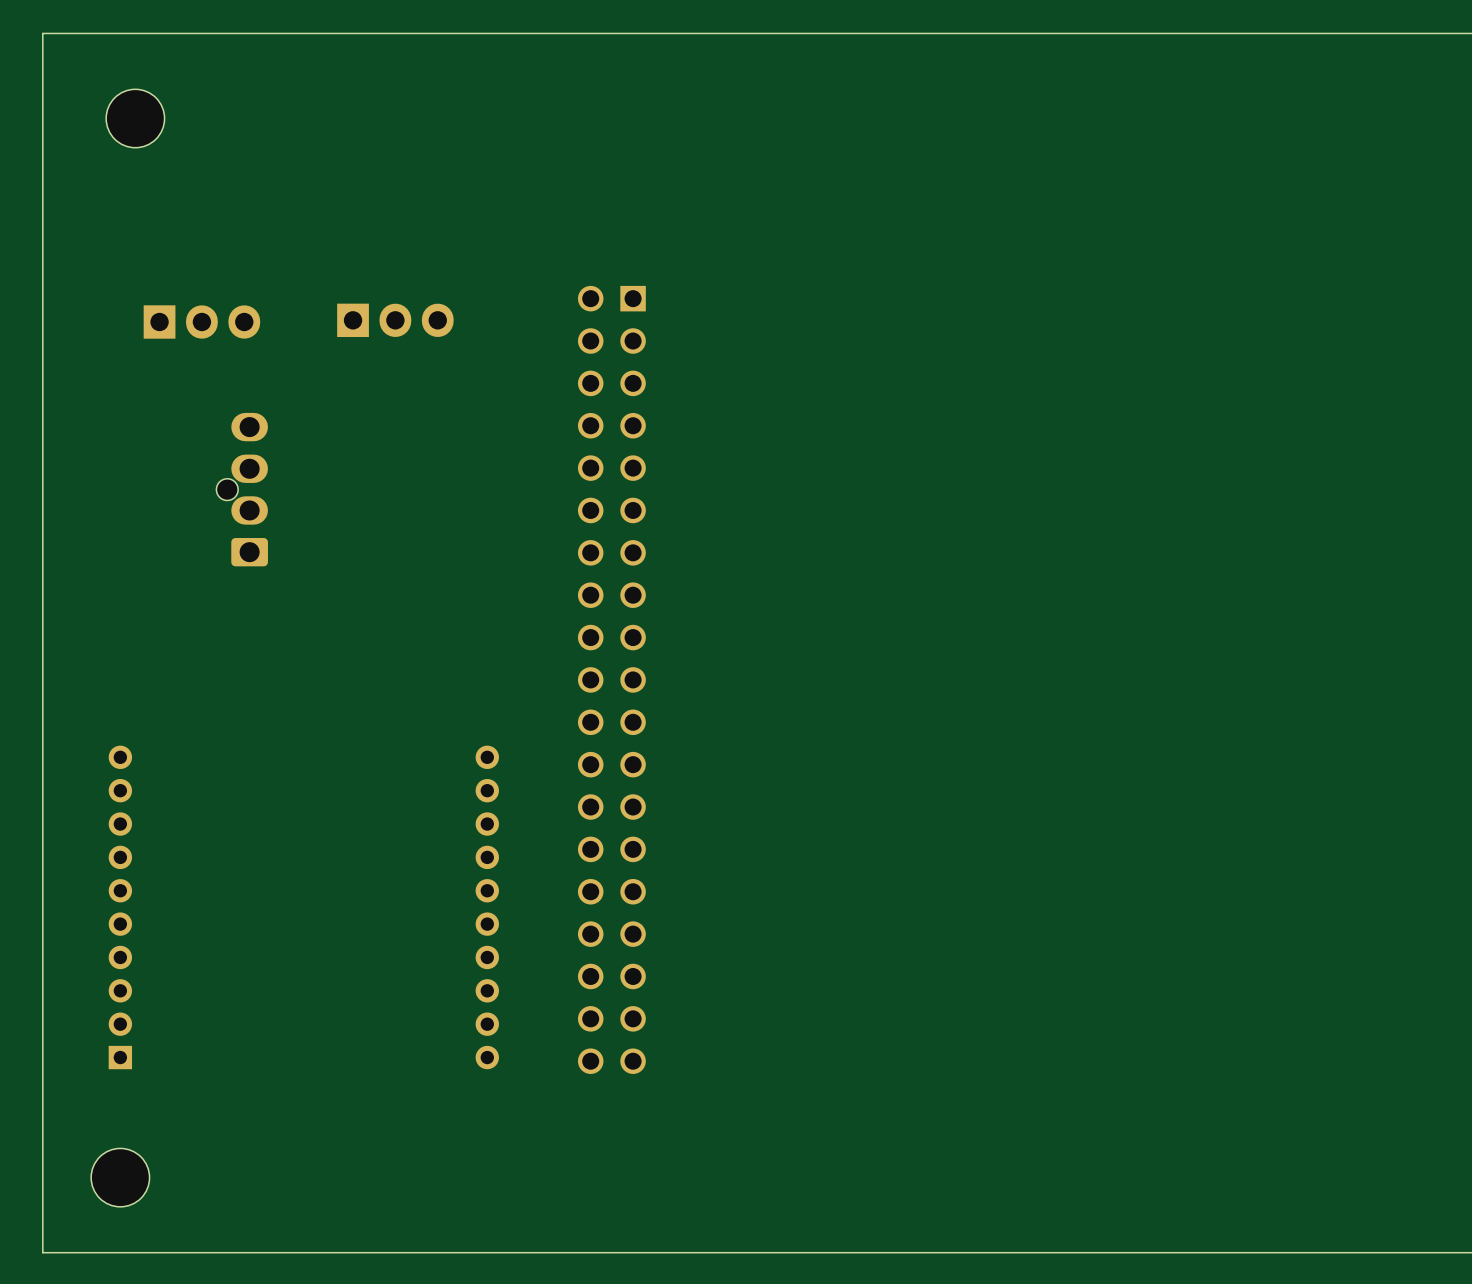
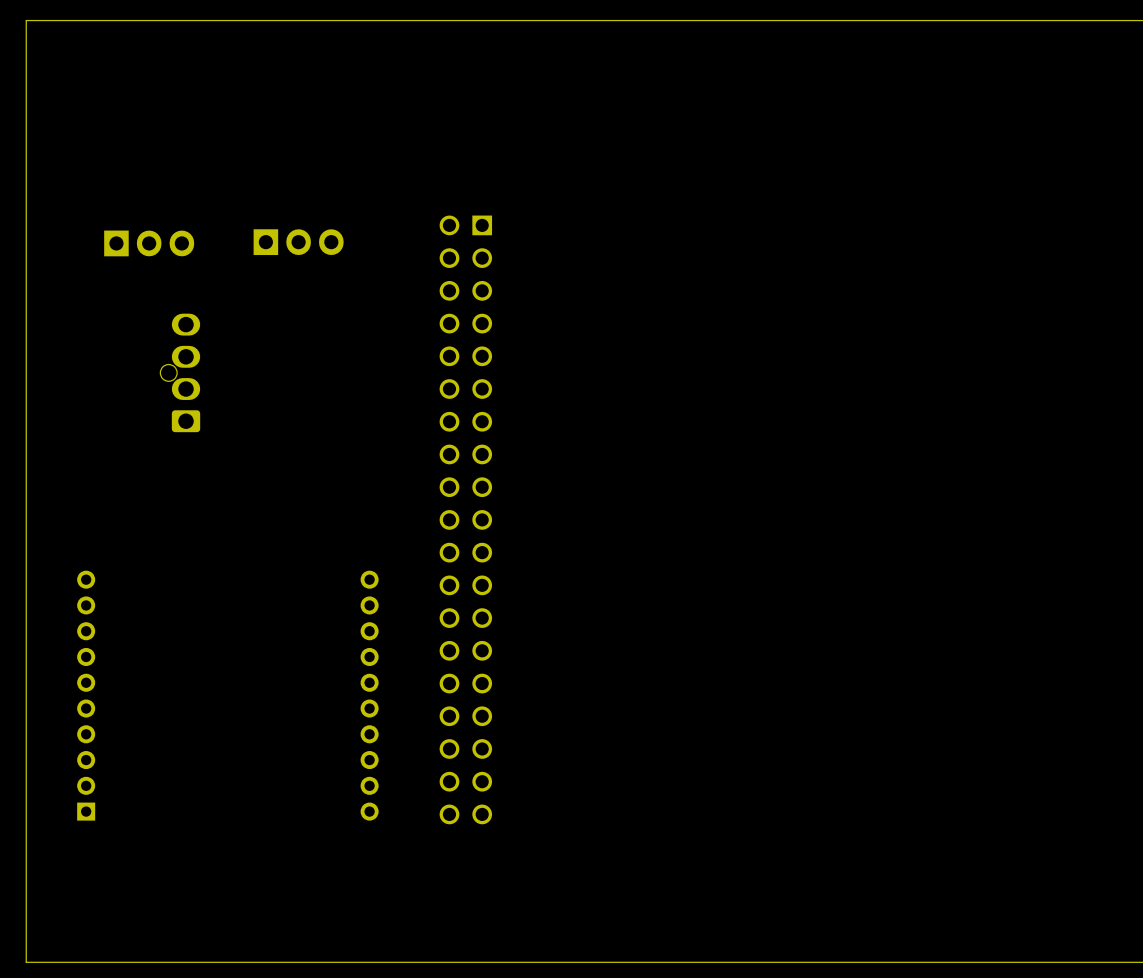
part: (135, 118) -> none
part: (120, 1177) -> none

